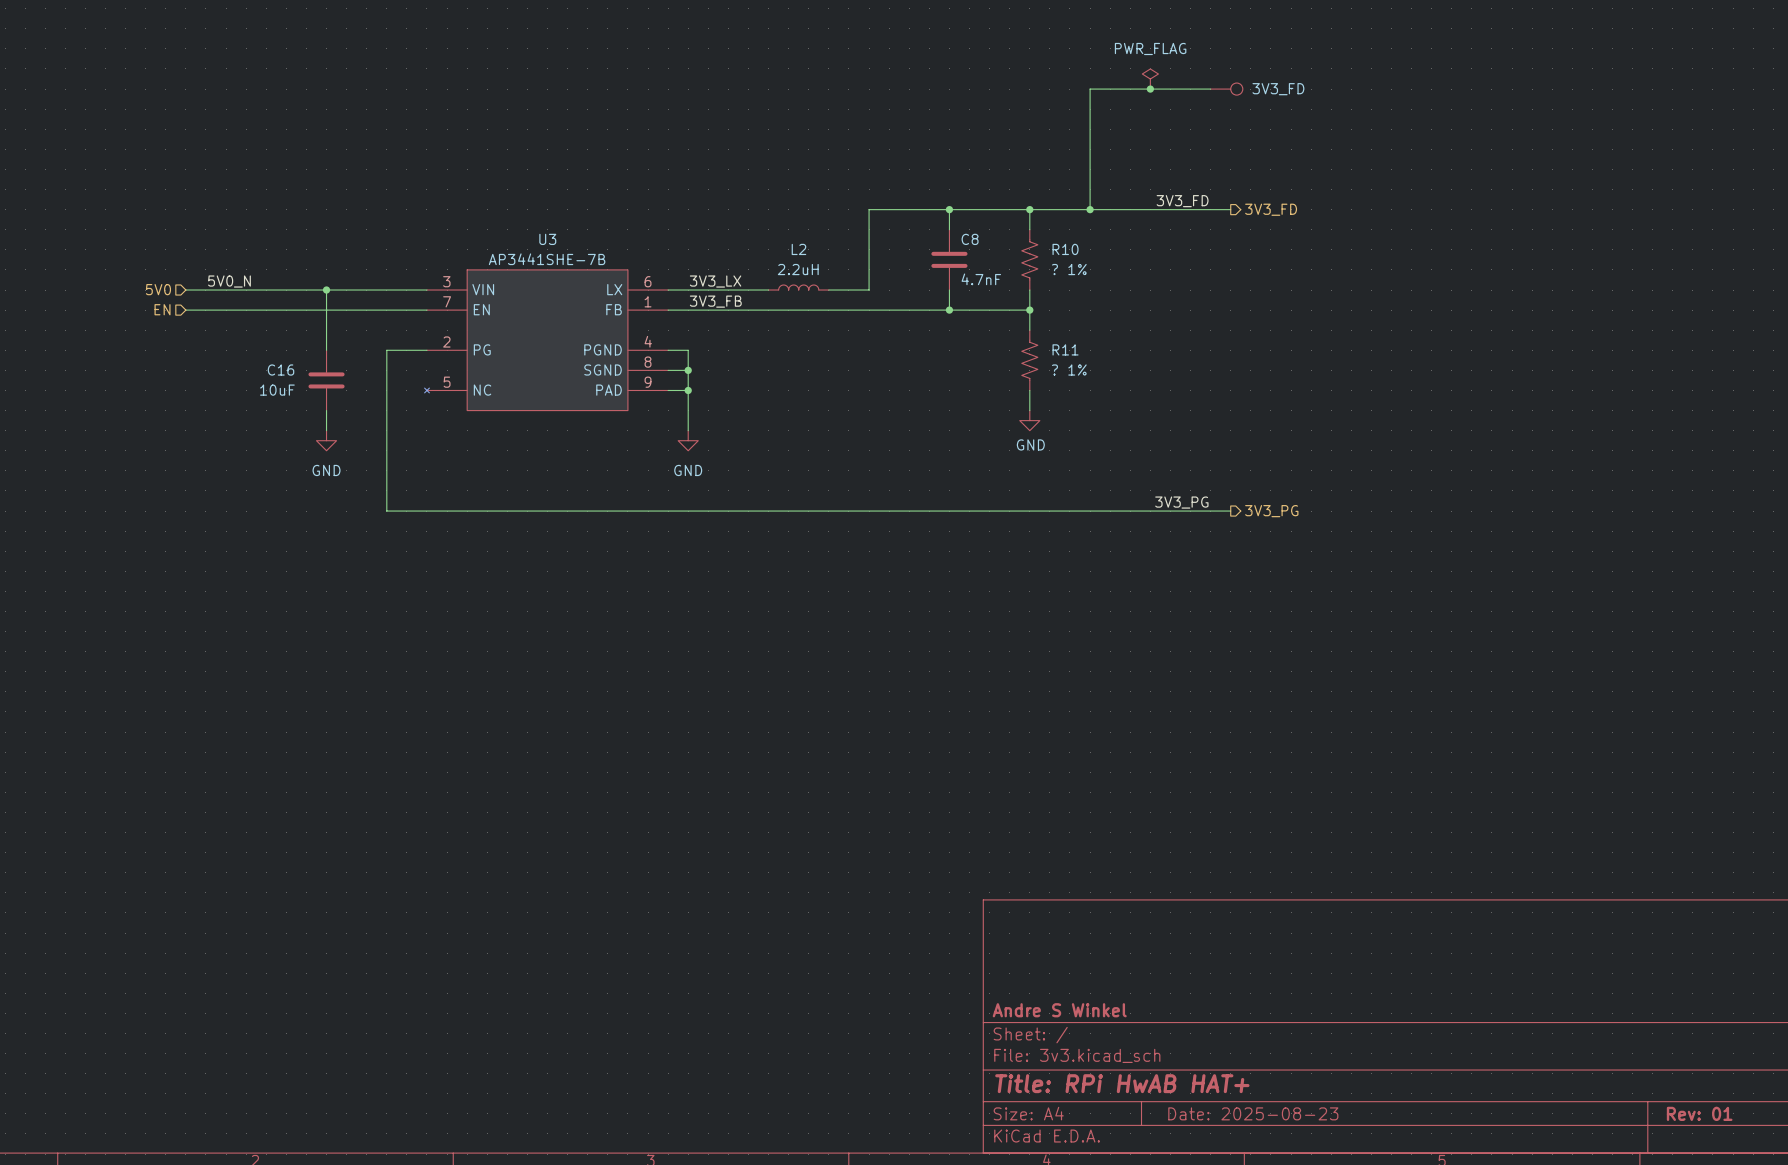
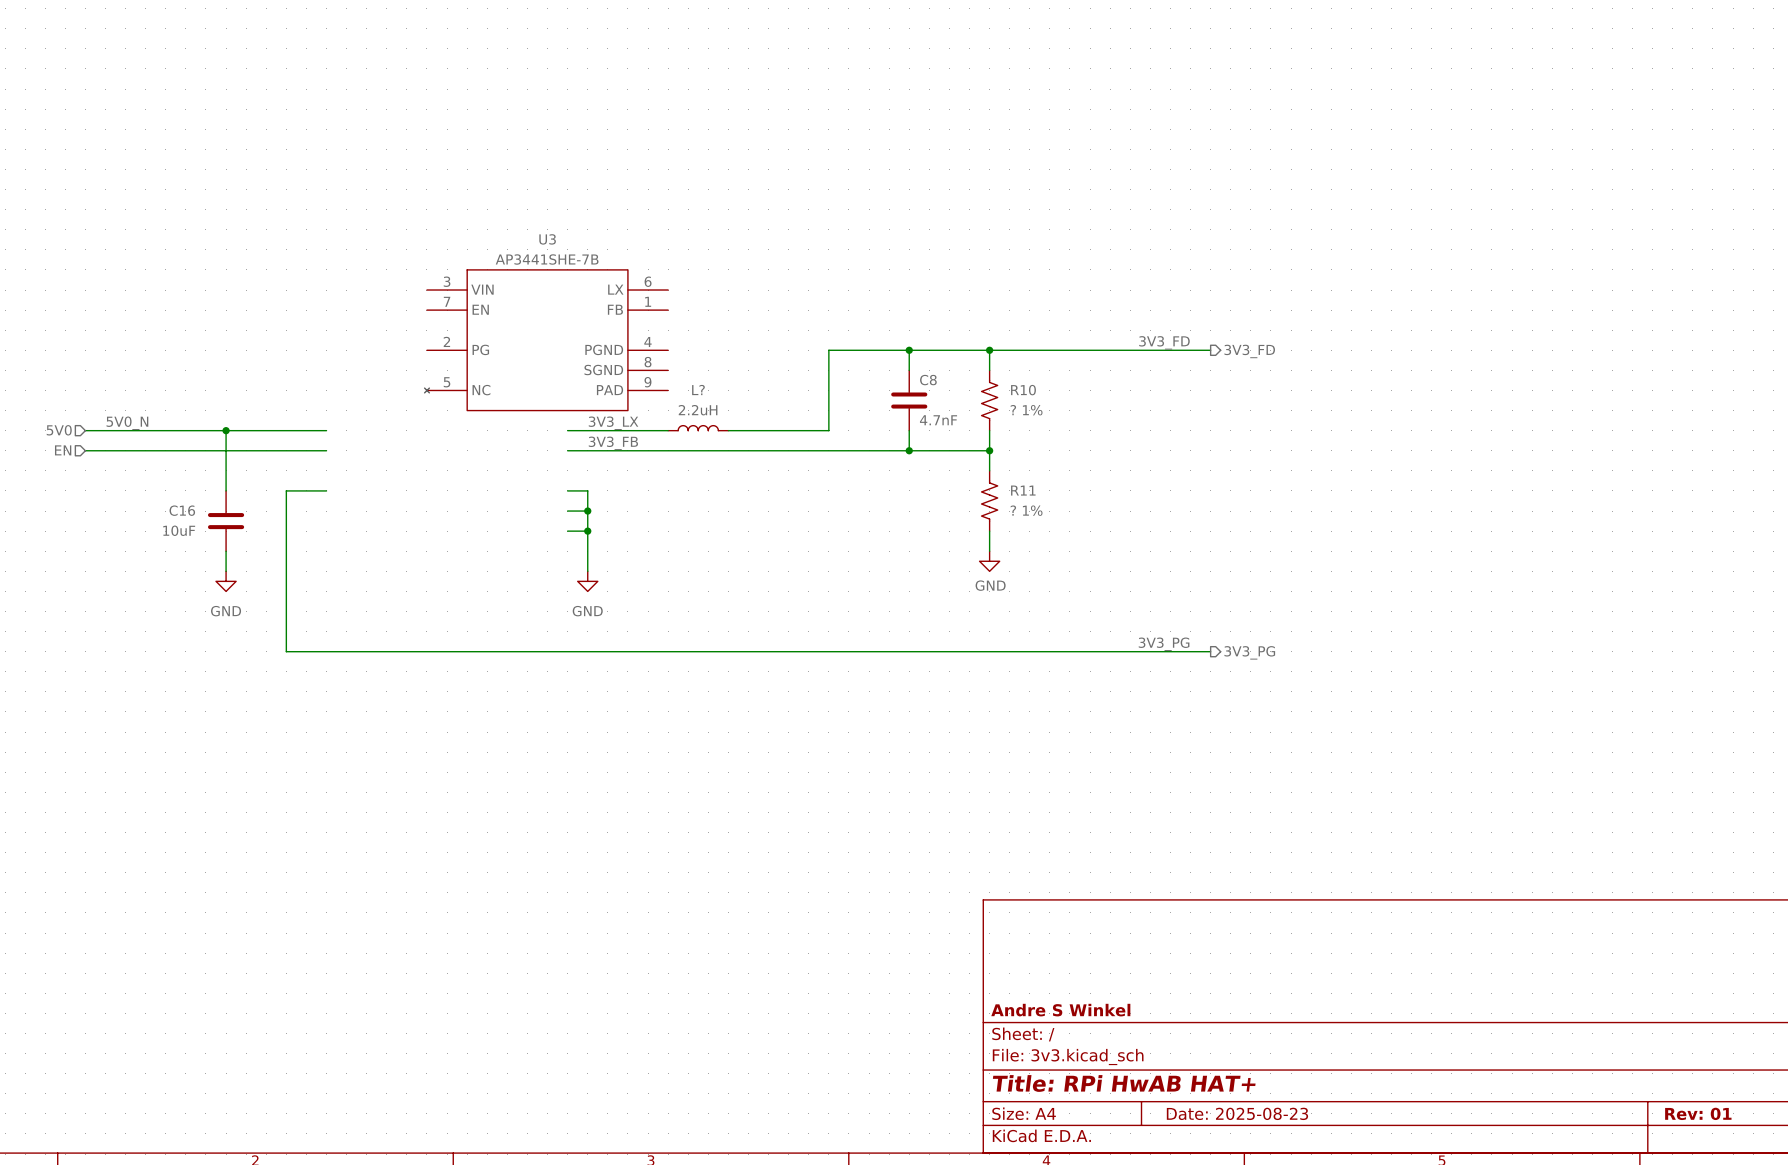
power symbol: PWR_FLAG (1150, 79) -> none
junction: (1150, 89) -> none
wire: (1210, 89) (1090, 89) (1090, 209) -> none
3V3_FD: (1226, 89) -> none
label position: 3V3_FD (1182, 201) -> 3V3_FD (1164, 342)
wire: (949, 209) (949, 229) -> (909, 350) (909, 370)
junction: (949, 209) -> none
wire: (1029, 209) (1029, 229) -> (989, 350) (989, 370)
junction: (1029, 209) -> none
junction: (1090, 209) -> none
wire: (1230, 209) (869, 209) (869, 290) (828, 290) -> none
hierarchical label position: 3V3_FD (1271, 209) -> 3V3_FD (1249, 351)
C8 position: (949, 259) -> (909, 400)
R10 position: (1029, 259) -> (989, 400)
label position: 5V0_N (229, 281) -> 5V0_N (127, 423)
label position: 3V3_LX (715, 281) -> 3V3_LX (613, 423)
L2: 2.2uH (798, 287) -> none
hierarchical label position: 5V0 (158, 289) -> 5V0 (59, 430)
wire: (185, 290) (426, 290) -> none
wire: (326, 290) (326, 350) -> (226, 430) (226, 490)
junction: (326, 290) -> none
wire: (668, 290) (768, 290) -> (567, 430) (668, 430)
wire: (949, 290) (949, 310) -> (909, 430) (909, 450)
wire: (1029, 290) (1029, 330) -> (989, 430) (989, 470)
label position: 3V3_FB (715, 301) -> 3V3_FB (613, 443)
hierarchical label position: EN (162, 309) -> EN (63, 450)
wire: (185, 310) (426, 310) -> (85, 450) (326, 450)
wire: (668, 310) (1029, 310) -> none
junction: (949, 310) -> none
junction: (1029, 310) -> none
wire: (426, 350) (386, 350) (386, 511) (567, 511) -> none
wire: (668, 350) (688, 350) (688, 430) -> (567, 490) (587, 490) (587, 571)
junction: none -> (909, 350)
junction: none -> (989, 350)
wire: none -> (1210, 350) (828, 350) (828, 430) (728, 430)
R11 position: (1029, 360) -> (989, 500)
wire: (668, 370) (688, 370) -> none
junction: (688, 370) -> none
C16 position: (326, 380) -> (226, 521)
wire: (668, 390) (688, 390) -> (567, 531) (587, 531)
junction: (688, 390) -> none
wire: (1029, 390) (1029, 410) -> (989, 531) (989, 551)
wire: (326, 410) (326, 430) -> (85, 430) (326, 430)
power symbol position: GND (1029, 420) -> GND (989, 561)
L?: none -> 2.2uH (698, 428)
junction: none -> (226, 430)
power symbol: GND (326, 440) -> none
power symbol: GND (688, 440) -> none
wire: none -> (567, 450) (989, 450)
junction: none -> (909, 450)
junction: none -> (989, 450)
wire: none -> (326, 490) (286, 490) (286, 651) (1210, 651)
label position: 3V3_PG (1181, 502) -> 3V3_PG (1164, 644)
wire: (587, 511) (1230, 511) -> none
junction: none -> (587, 511)
hierarchical label position: 3V3_PG (1271, 511) -> 3V3_PG (1249, 652)
junction: none -> (587, 531)
wire: none -> (226, 551) (226, 571)
power symbol: none -> GND (226, 581)
power symbol: none -> GND (587, 581)

